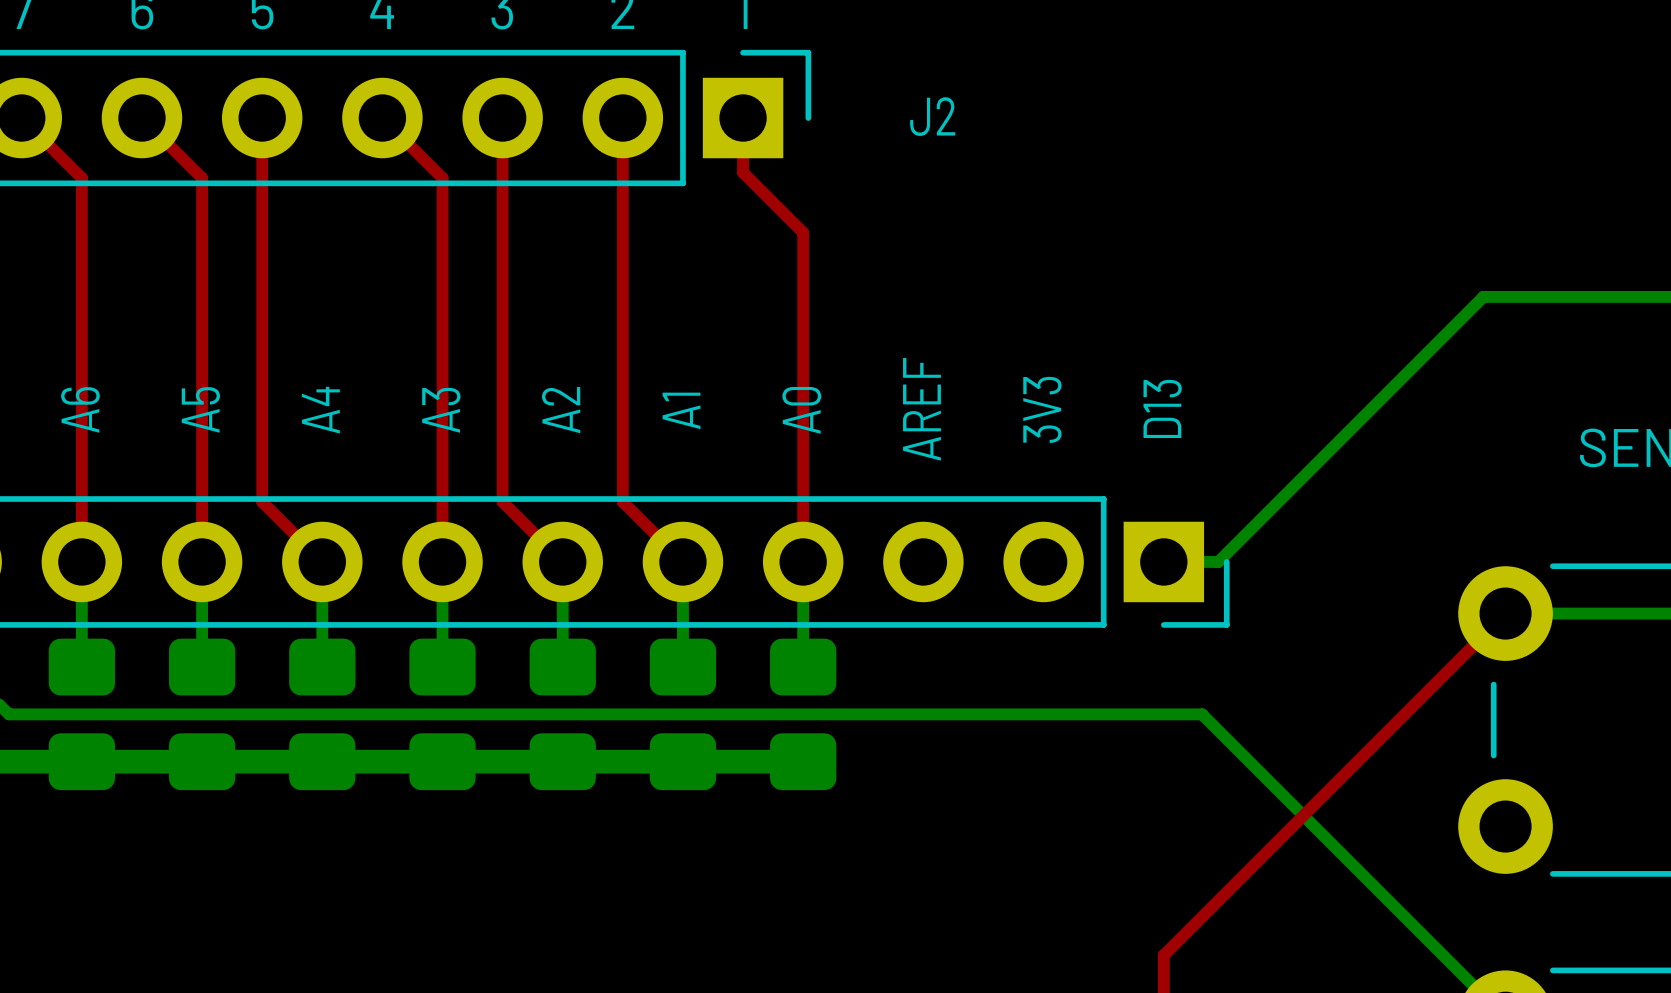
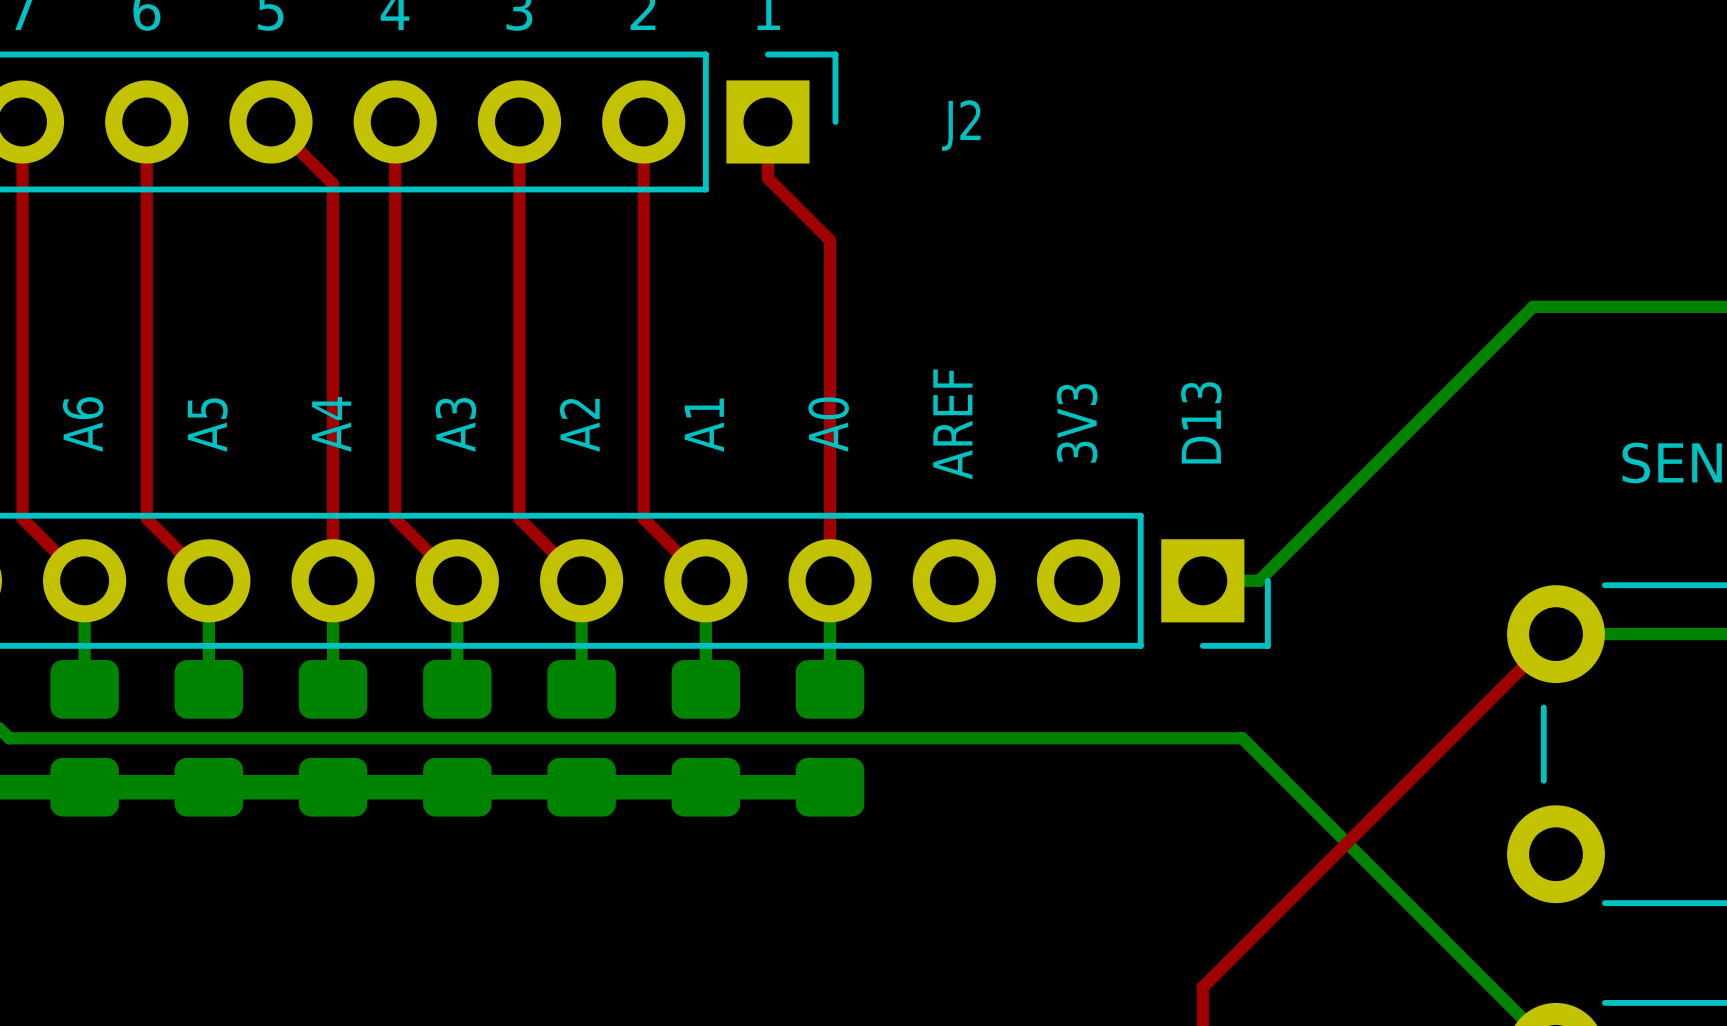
top track: (21, 118) (81, 178) (81, 561) -> (22, 121) (22, 518) (84, 580)
top track: (141, 118) (202, 178) (202, 561) -> (146, 121) (146, 518) (208, 580)
top track: (262, 118) (262, 501) (322, 561) -> (270, 121) (333, 184) (333, 580)
top track: (382, 118) (442, 178) (442, 561) -> (395, 121) (395, 518) (457, 580)

